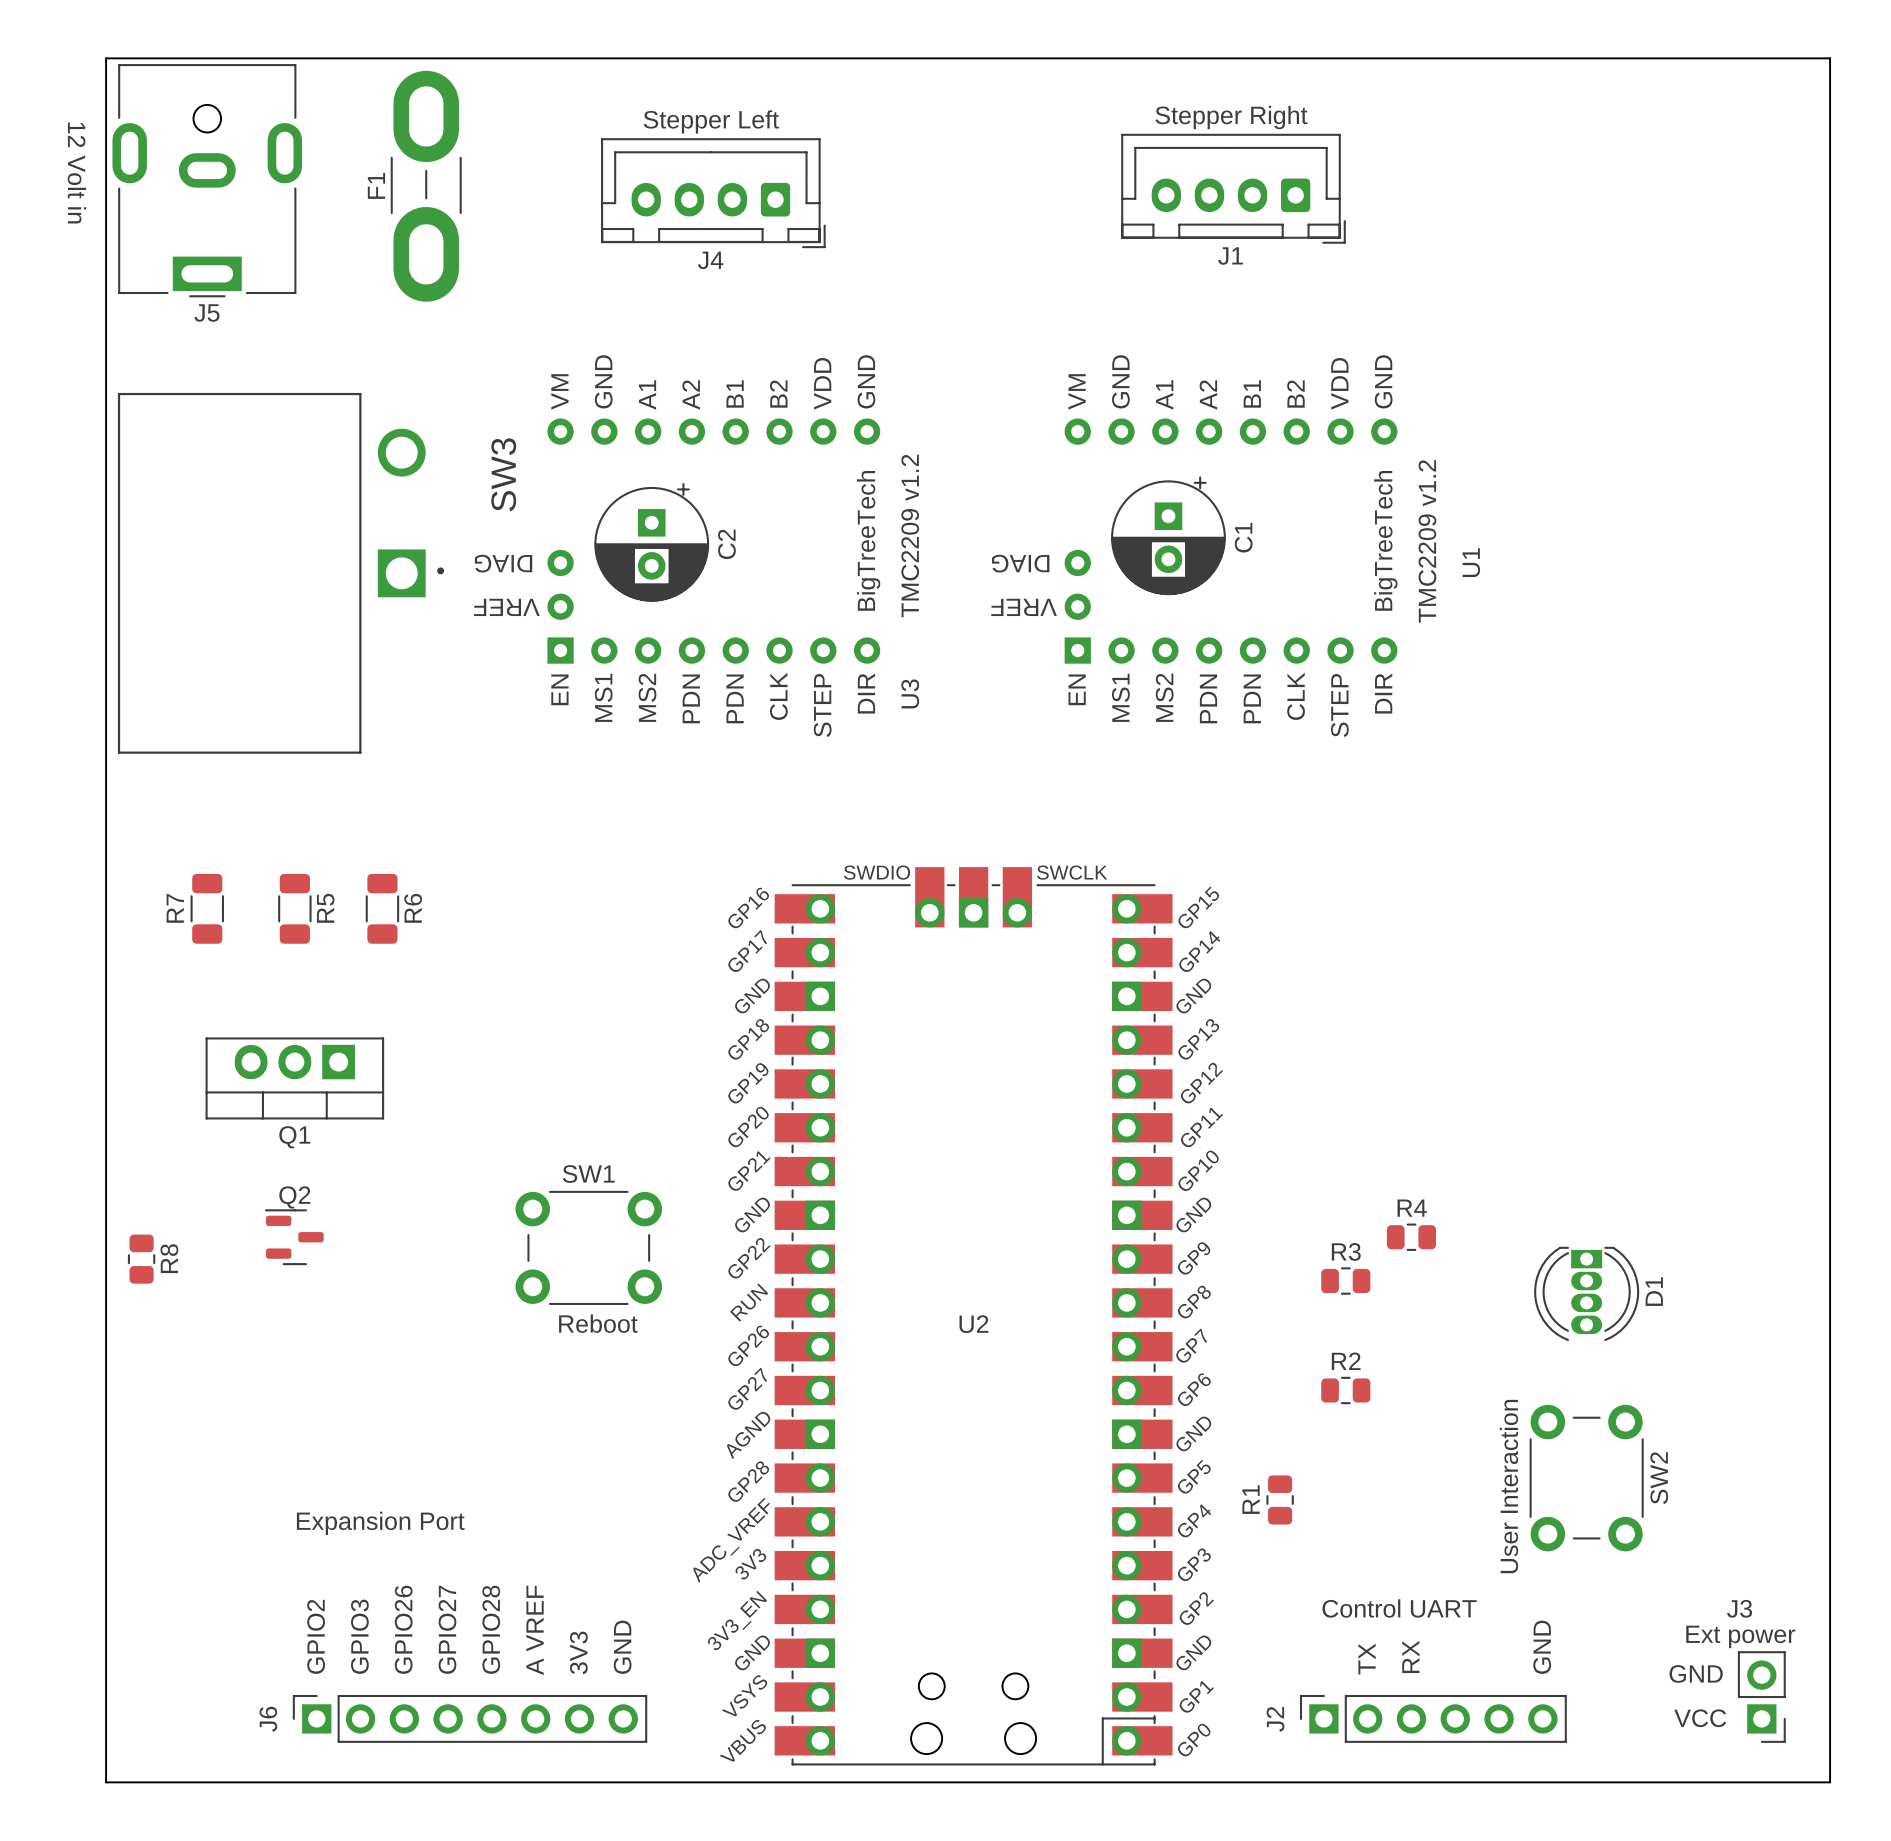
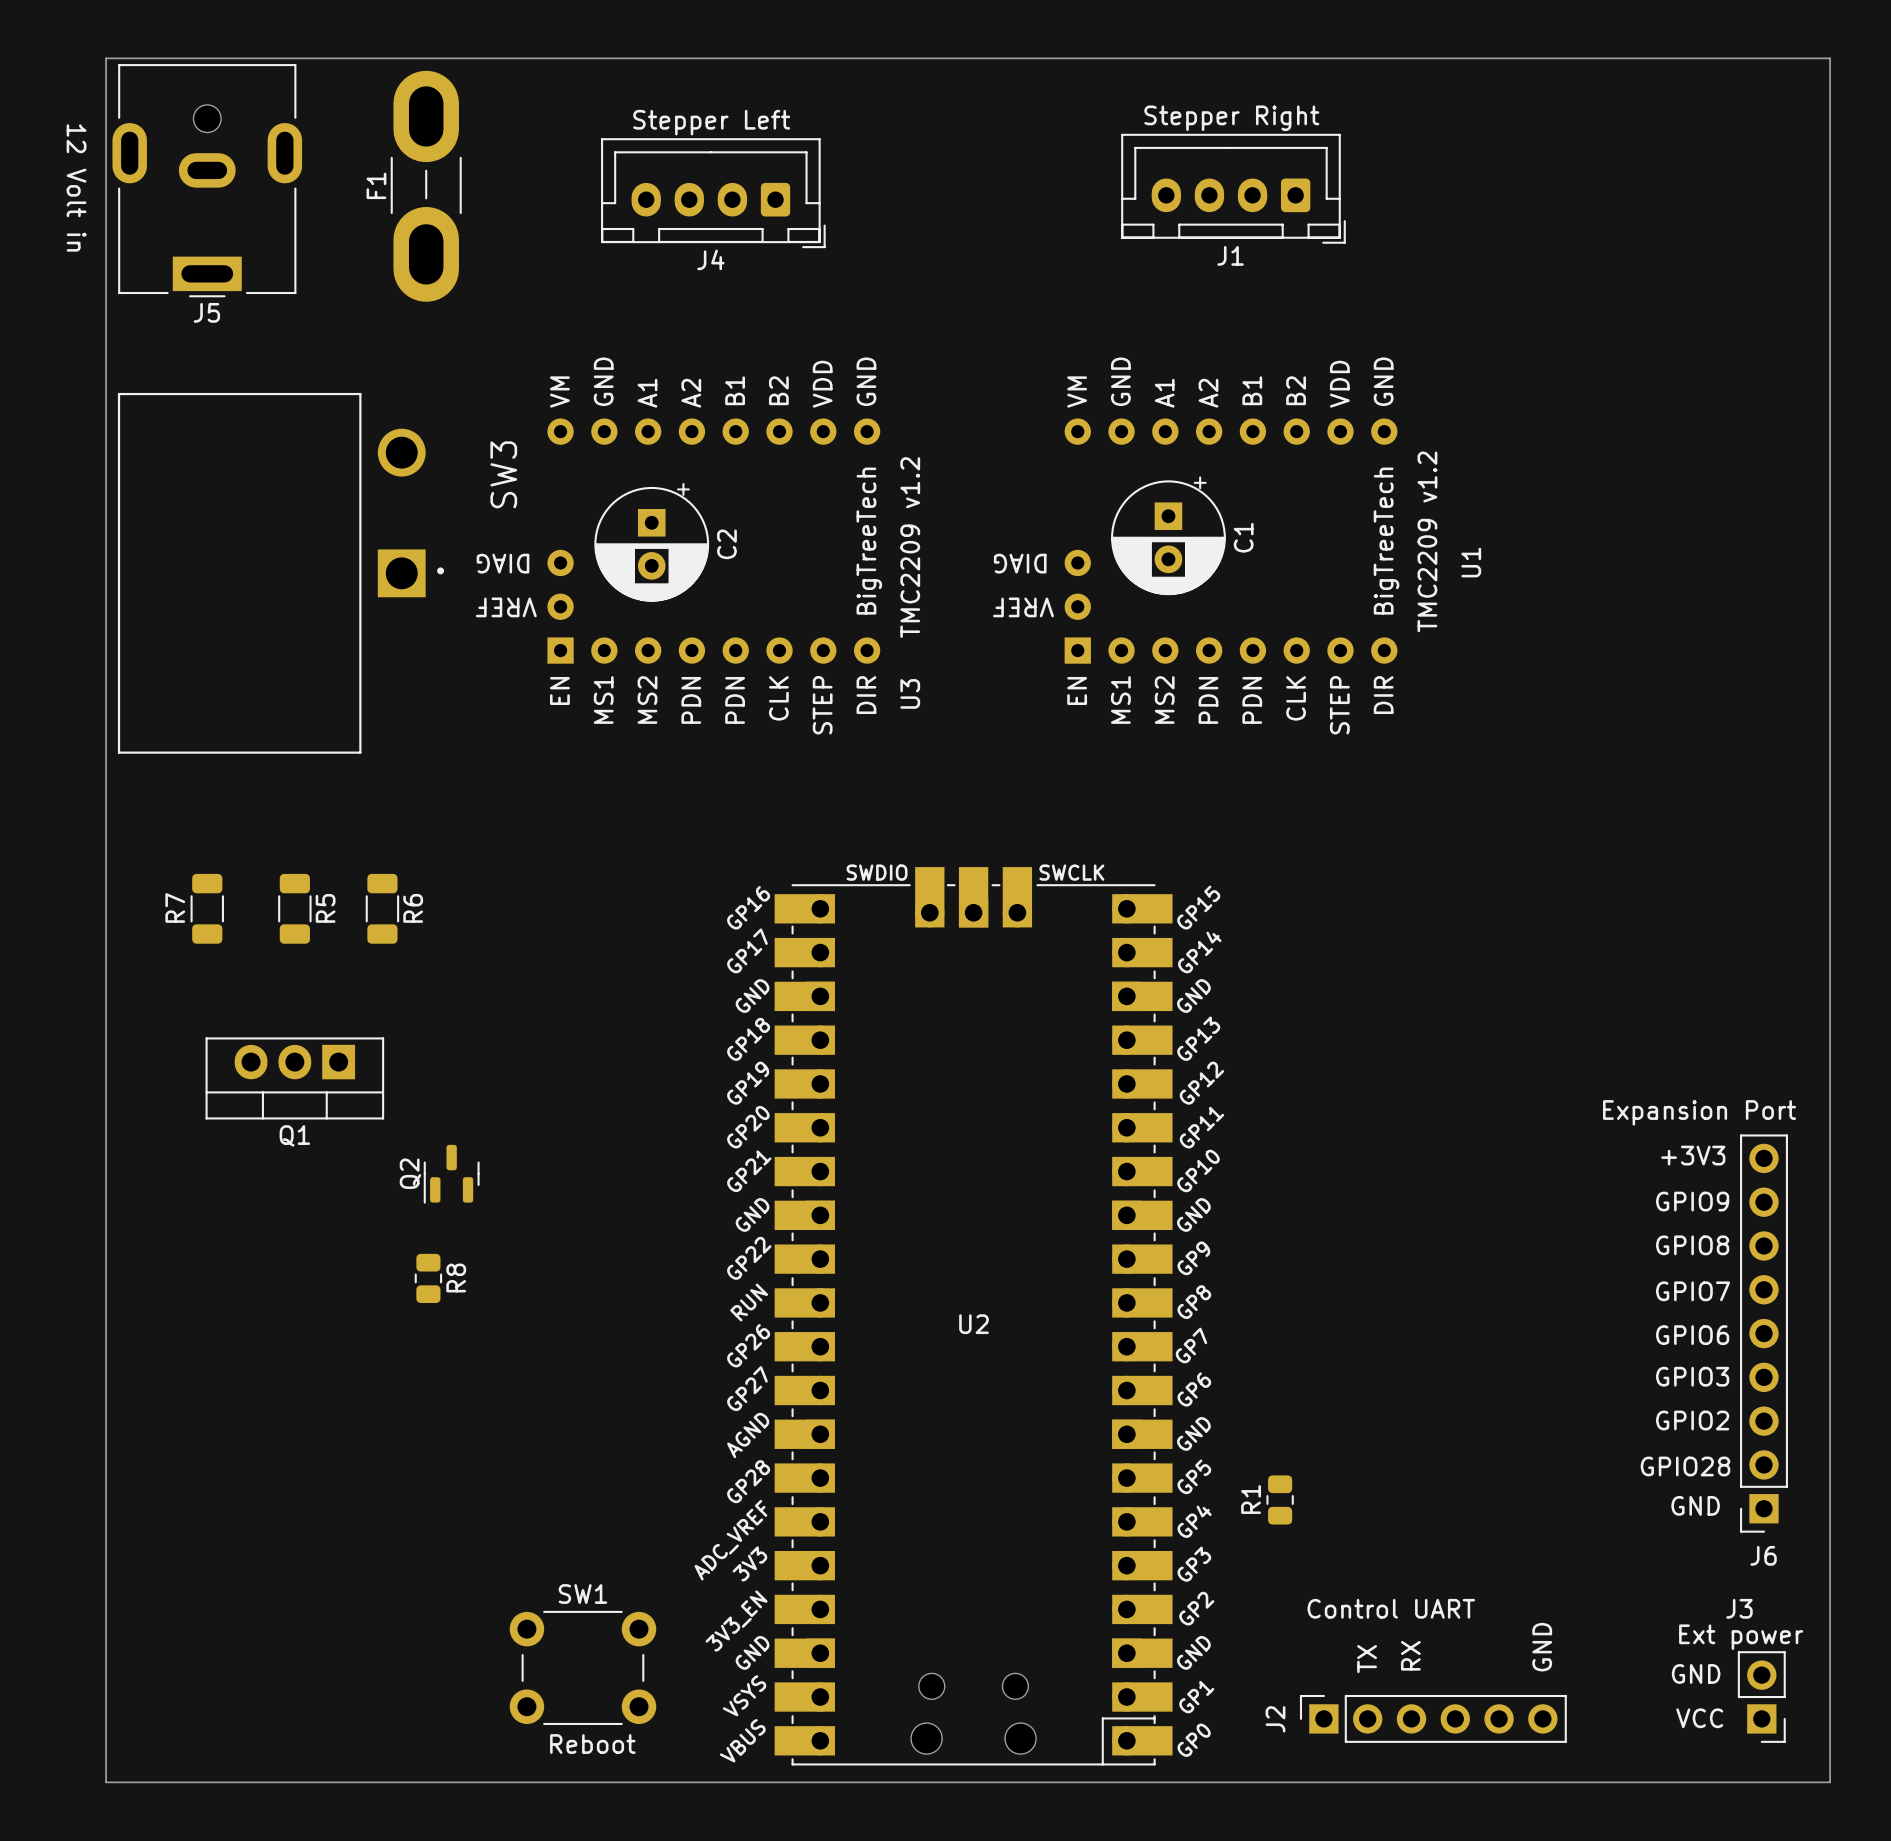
Q2 rotation: 0° (294, 1237) -> 90° counterclockwise (451, 1174)
Q2 position: (294, 1237) -> (451, 1174)
R4: (1411, 1237) -> none
SW1 position: (588, 1247) -> (582, 1667)
R8 position: (141, 1259) -> (428, 1278)
R3: (1345, 1281) -> none
D1: (1586, 1293) -> none
R2: (1345, 1390) -> none
SW2: User Interaction (1586, 1478) -> none
J6 footprint: [292, 1694, 648, 1743] -> [1740, 1134, 1788, 1533]
J6 name position: J6 (268, 1719) -> J6 (1763, 1555)

